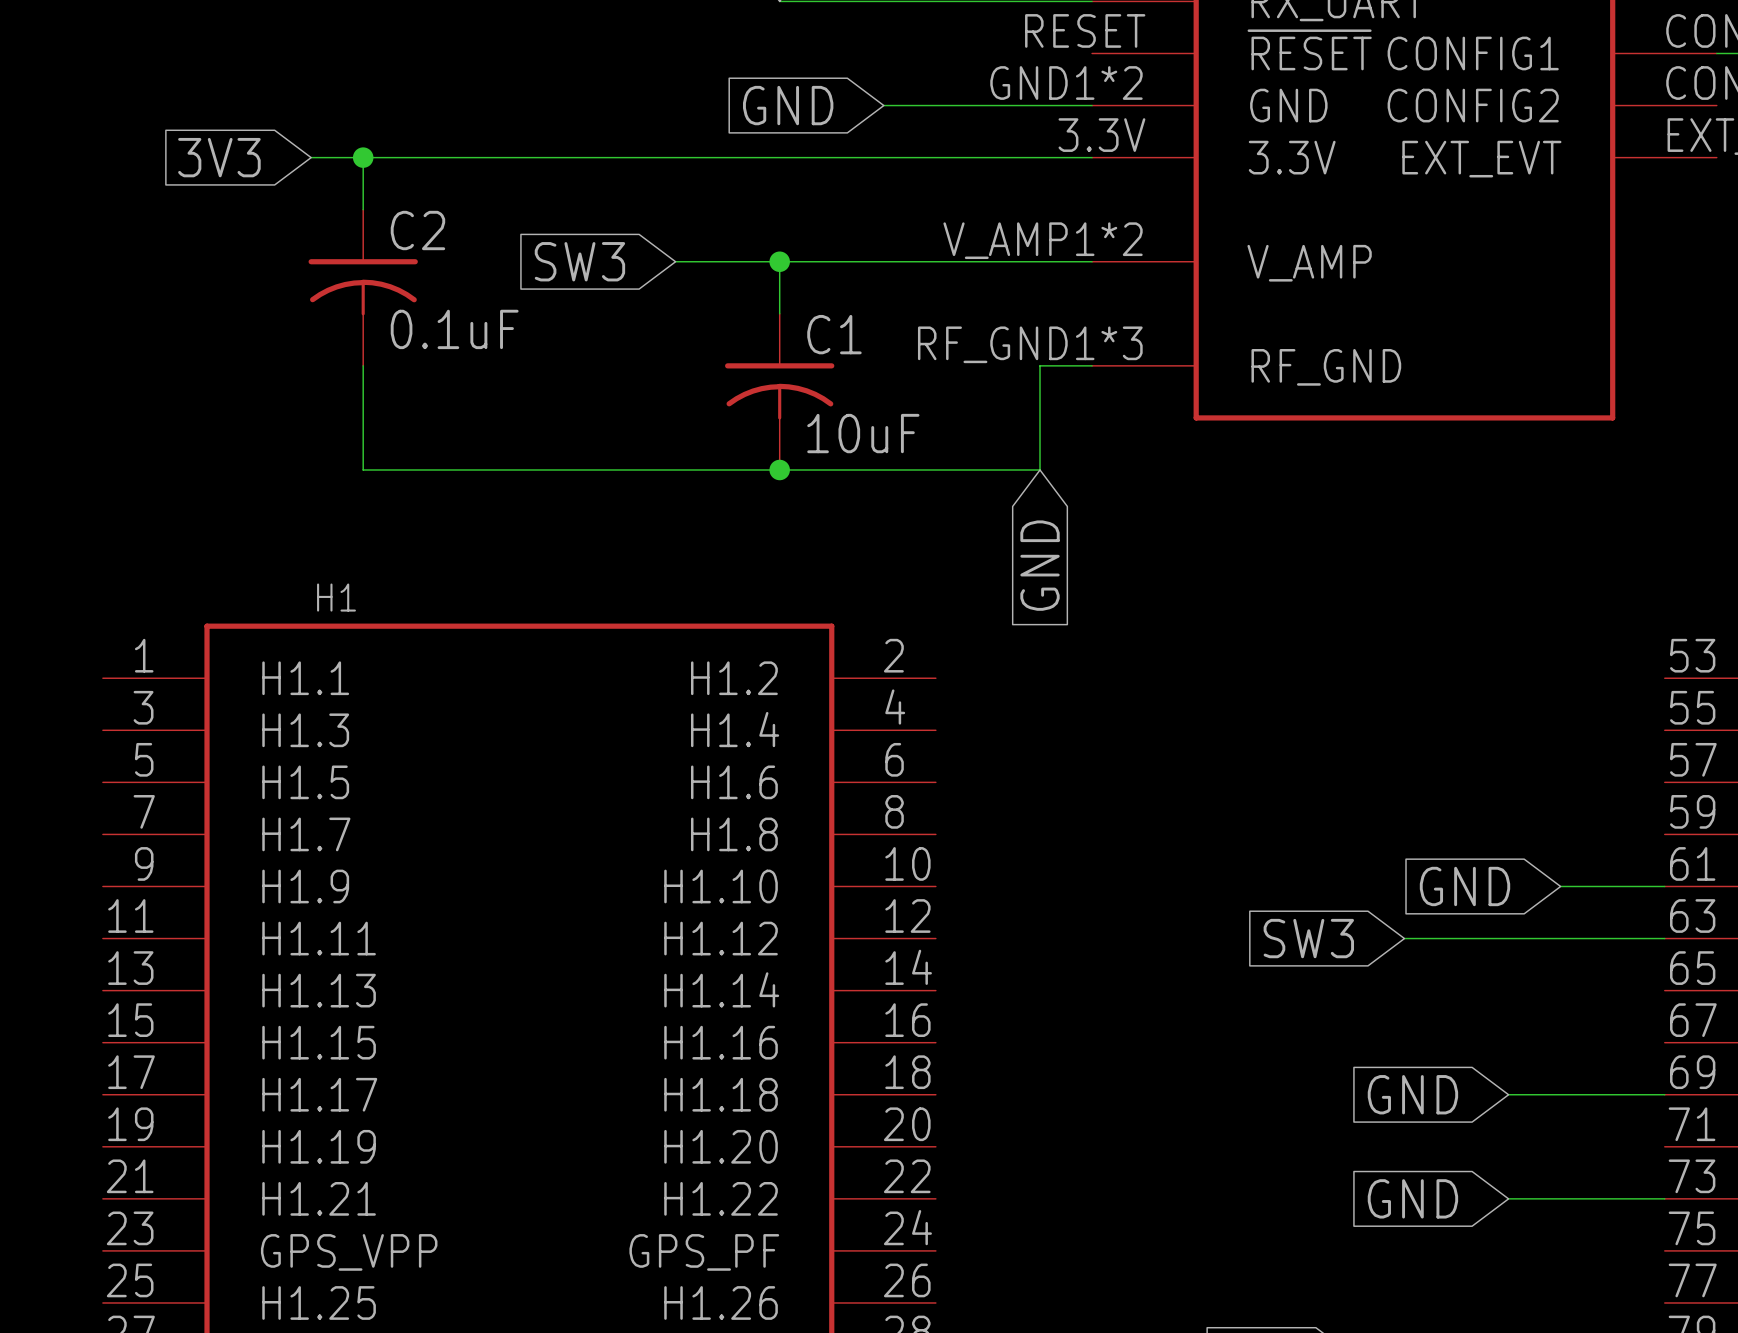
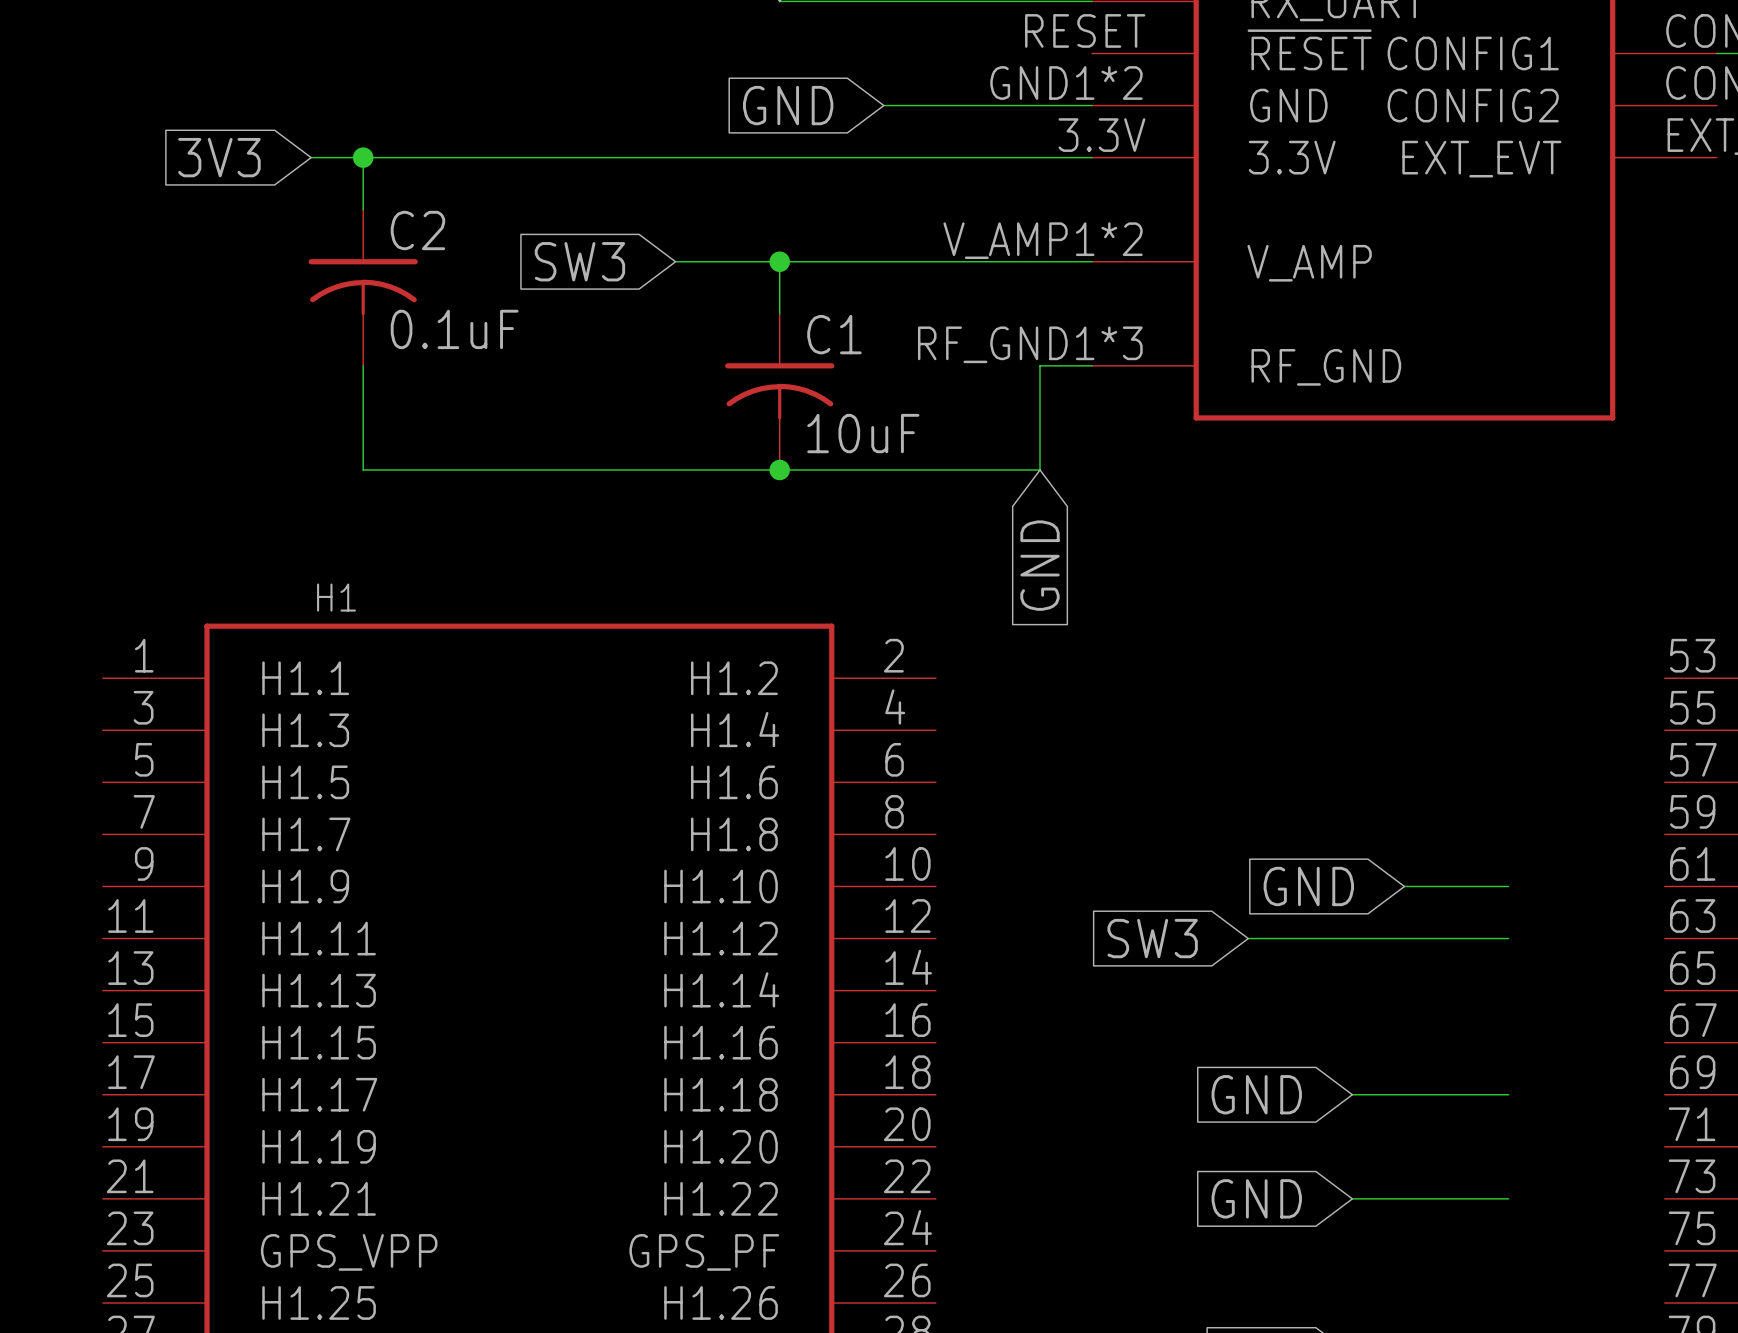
global label position: GND (1465, 886) -> GND (1308, 886)
wire: (1560, 886) (1664, 886) -> (1404, 886) (1508, 886)
global label position: SW3 (1308, 938) -> SW3 (1152, 938)
wire: (1508, 938) (1664, 938) -> (1248, 938) (1404, 938)
global label position: GND (1412, 1094) -> GND (1256, 1094)
wire: (1508, 1094) (1664, 1094) -> (1508, 1094) (1352, 1094)
global label position: GND (1412, 1198) -> GND (1256, 1198)
wire: (1508, 1198) (1664, 1198) -> (1508, 1198) (1352, 1198)

